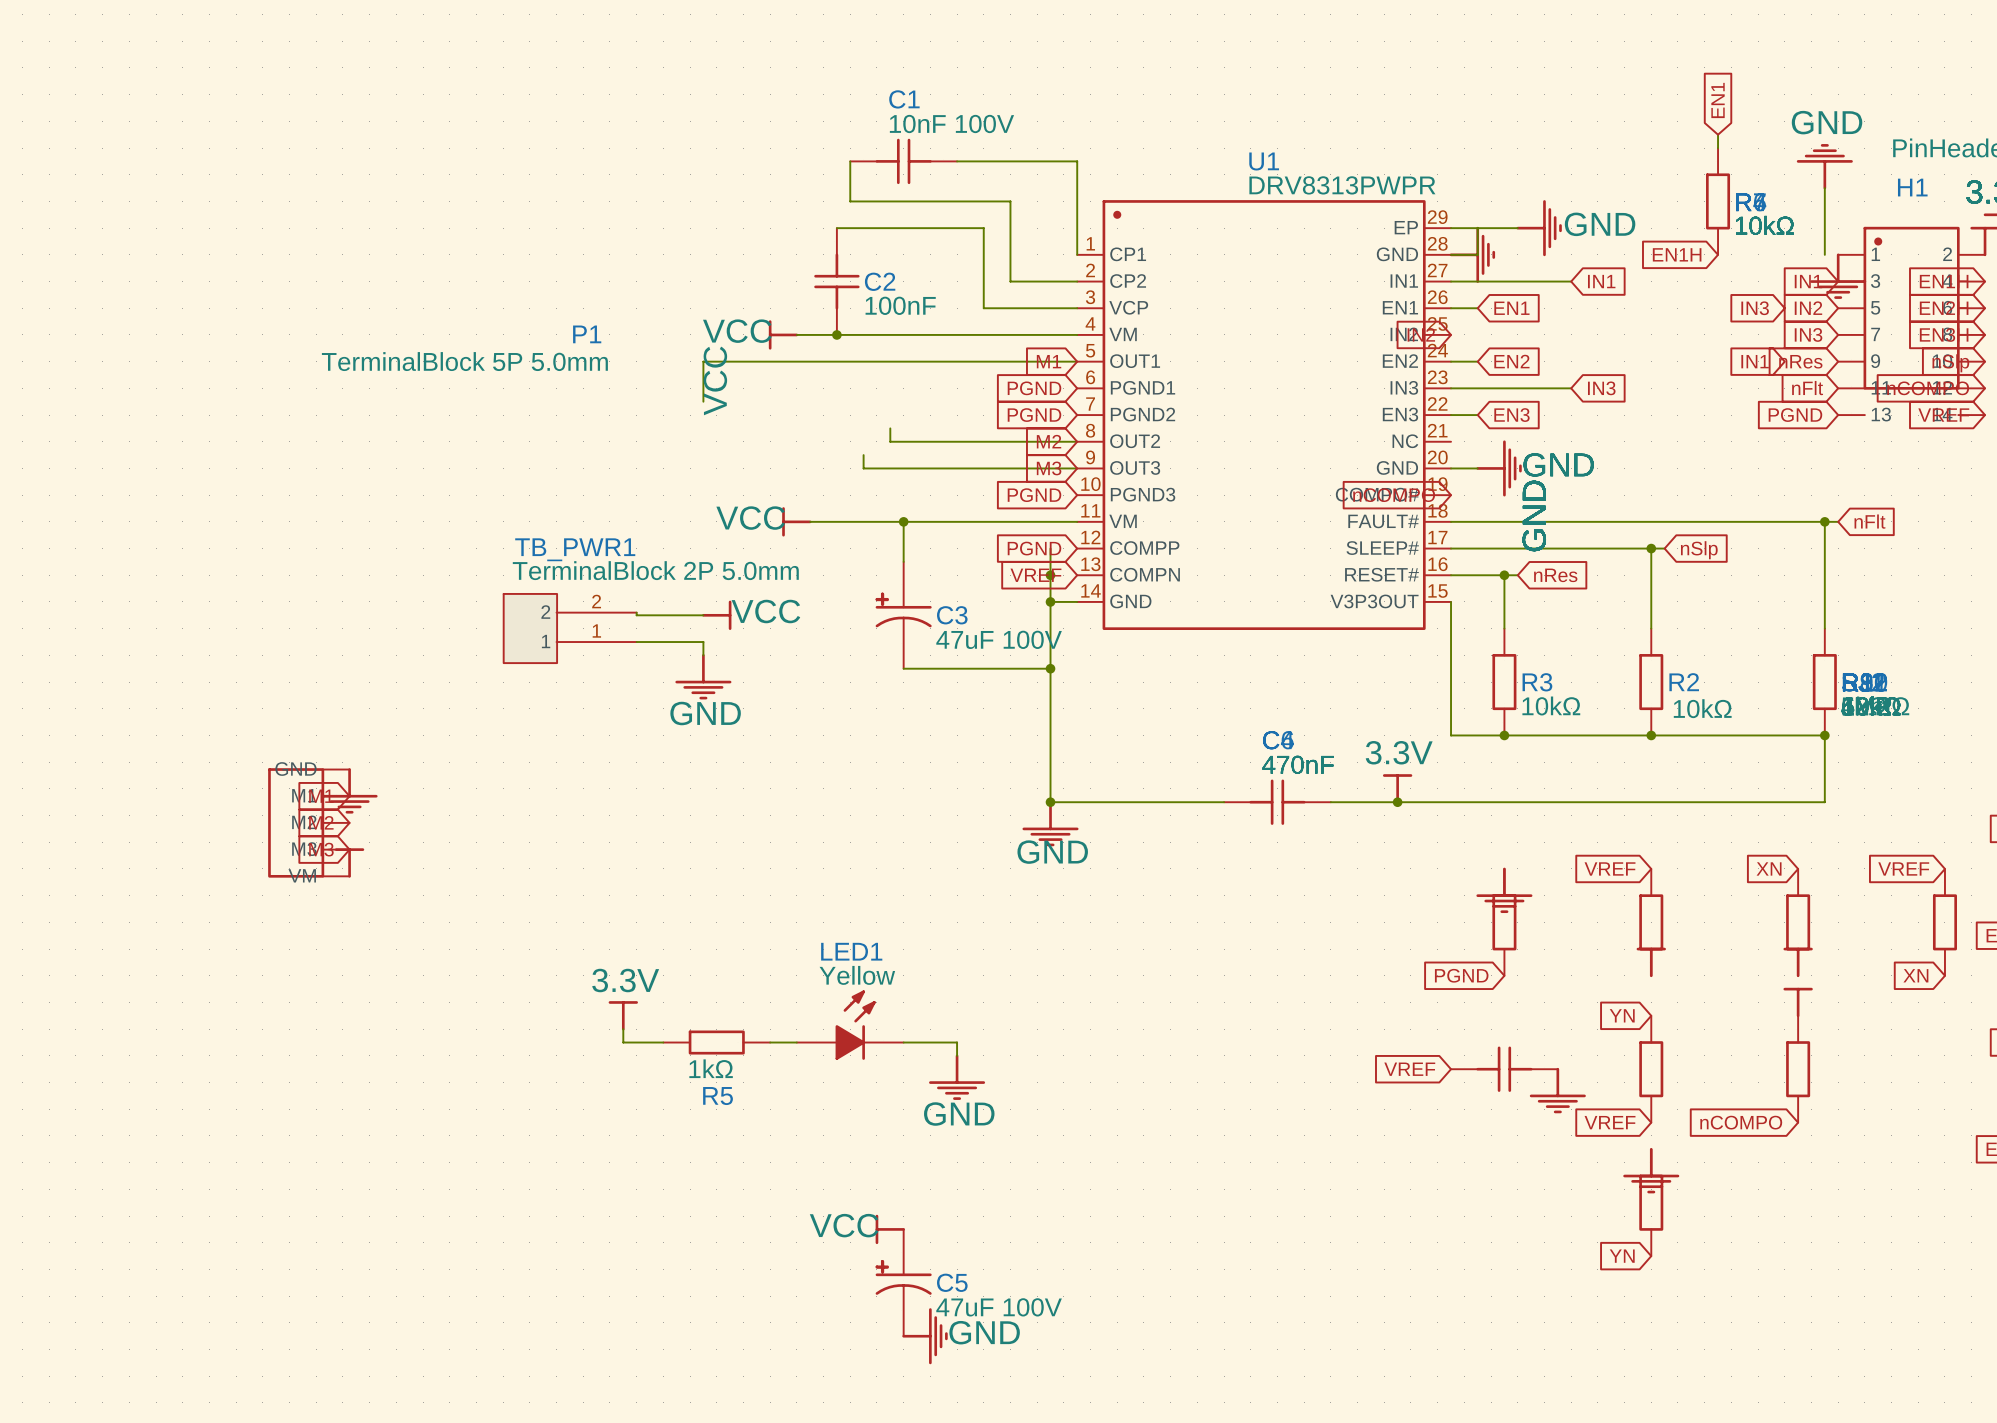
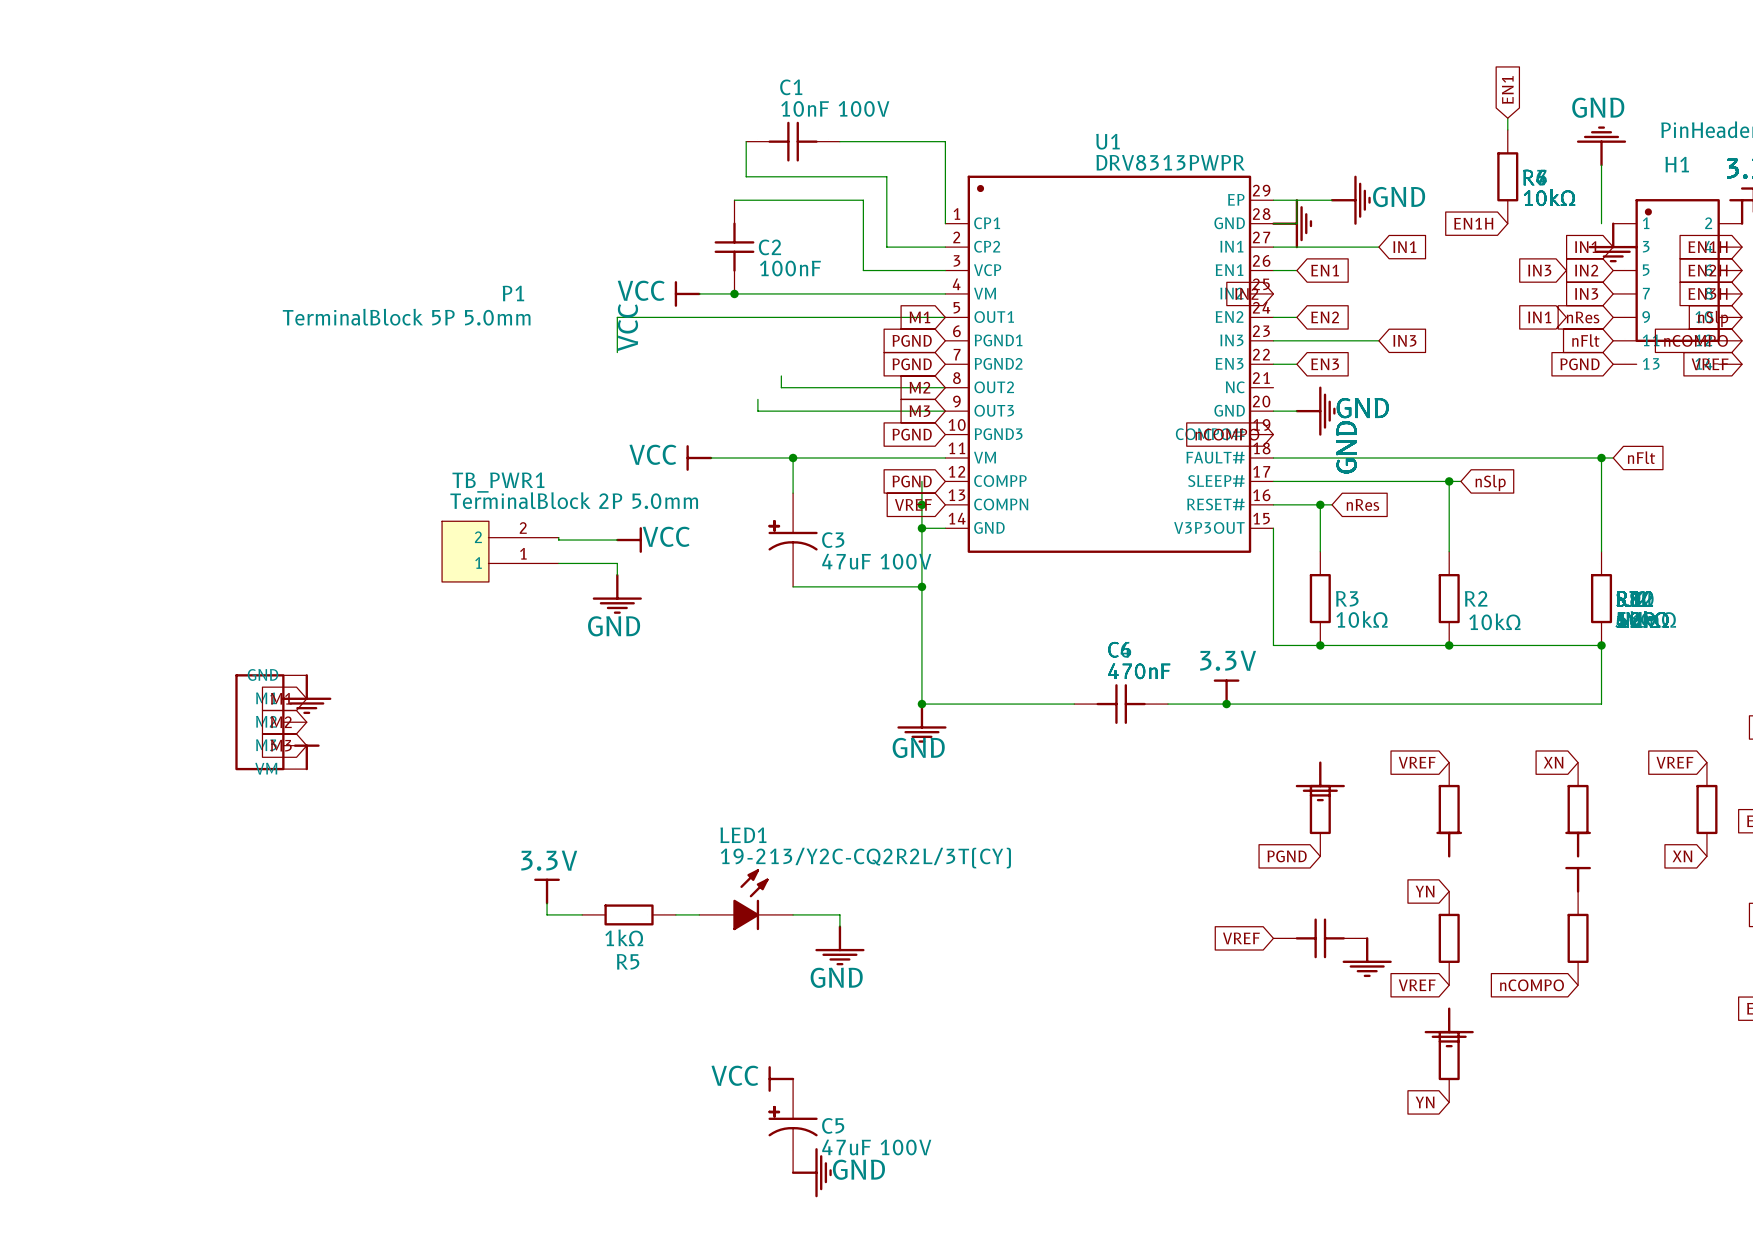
LED1 value: Yellow (857, 975) -> 19-213/Y2C-CQ2R2L/3T(CY) (865, 858)

